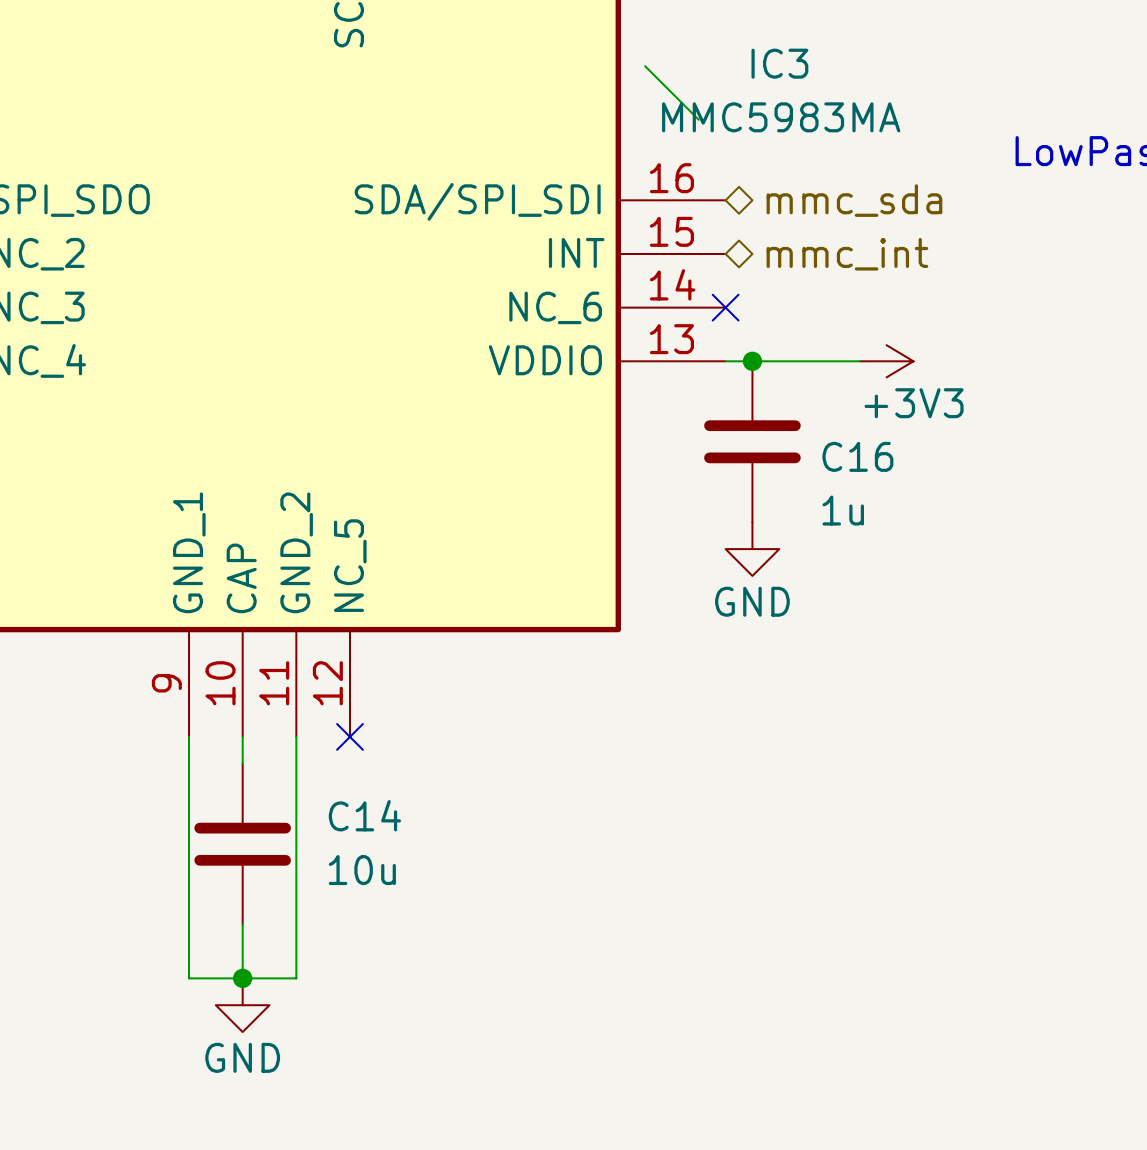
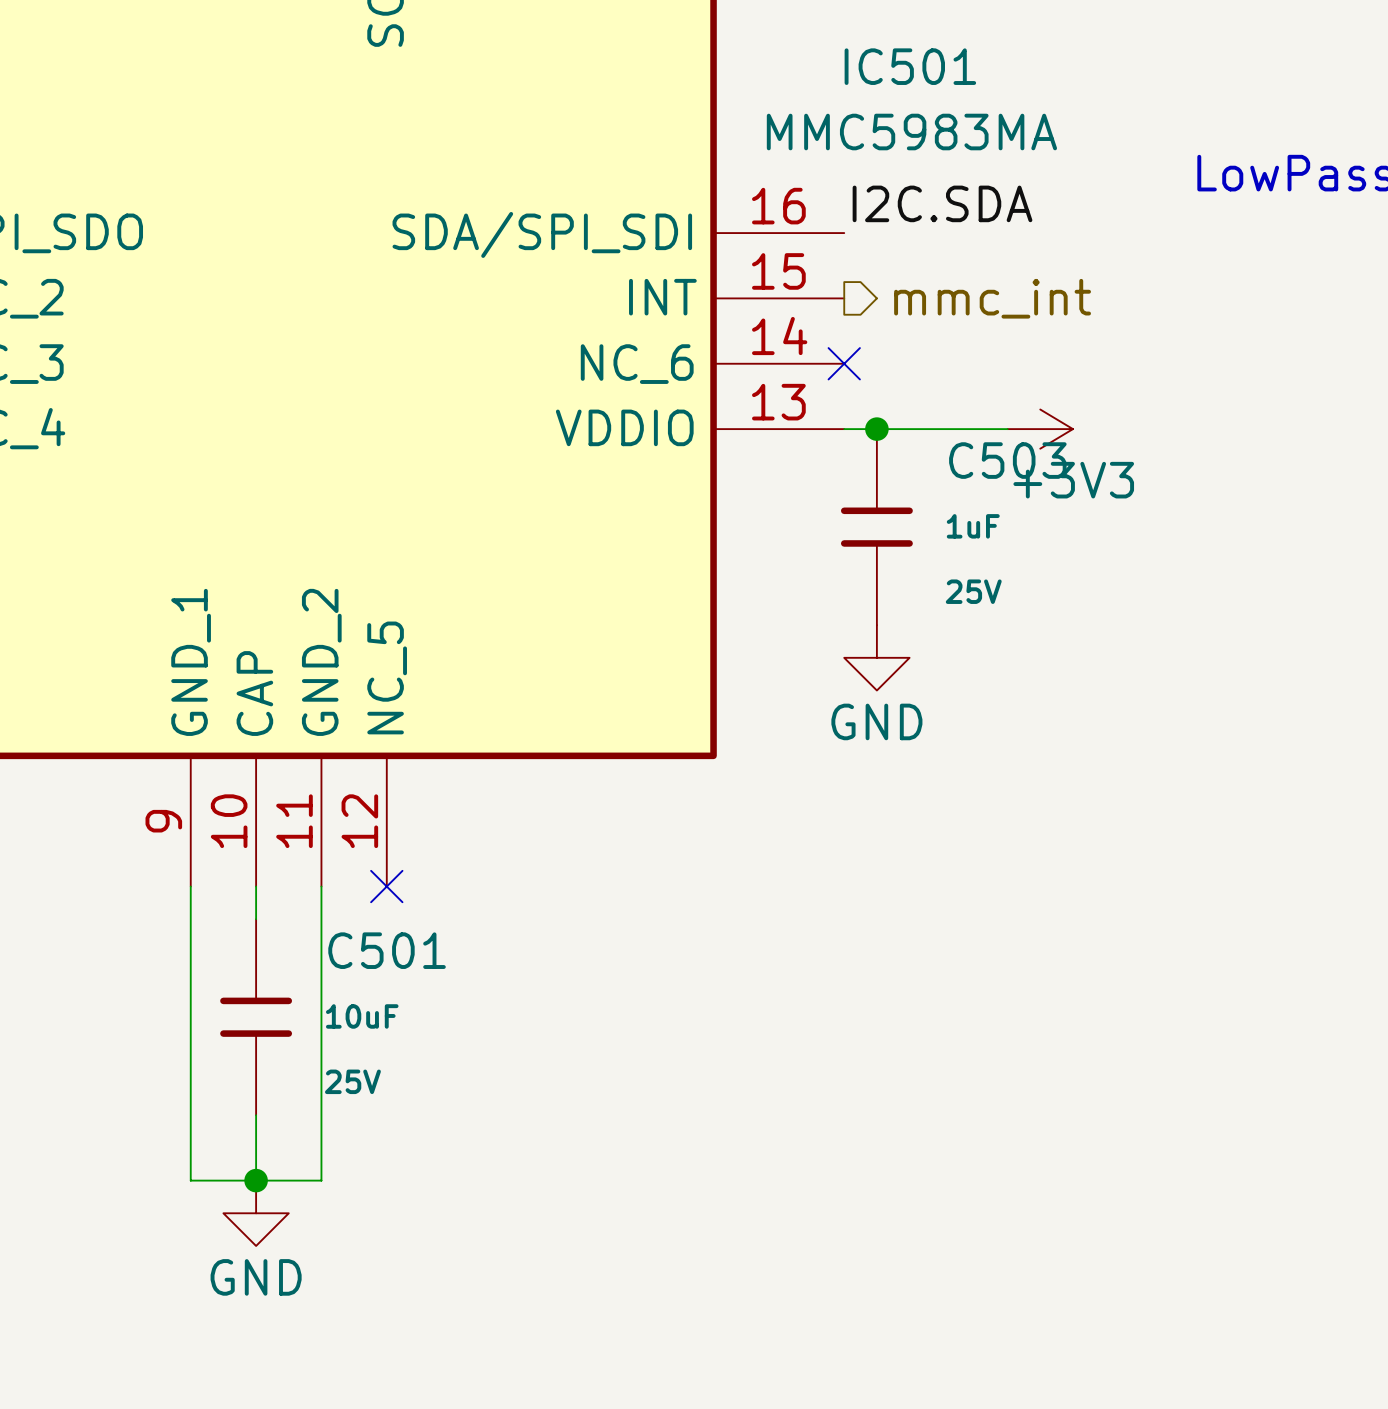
IC3 name: IC3 (779, 63) -> IC501 (910, 66)
wire: (645, 66) (698, 119) -> none
label: none -> I2C.SDA (942, 203)
hierarchical label: mmc_sda (854, 200) -> none
hierarchical label shape: bidirectional (847, 254) -> output (992, 298)
C16: 1u (752, 441) -> none
C503: none -> 1uF (876, 527)
C14: 10u (242, 844) -> none
C501: none -> 10uF (256, 1017)

